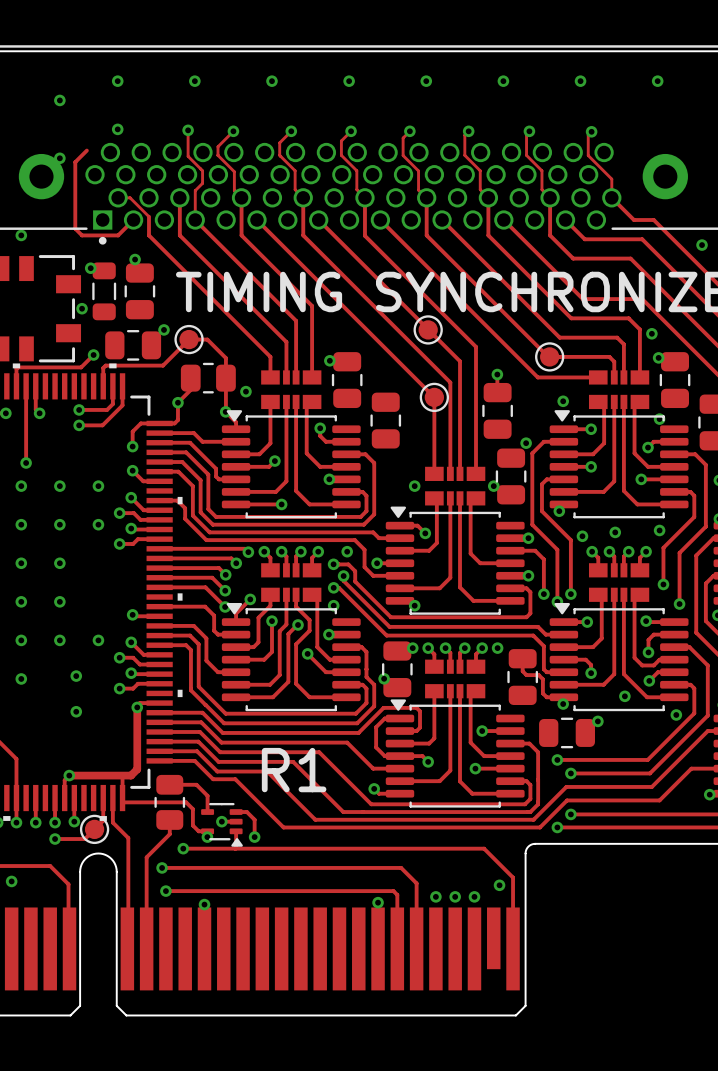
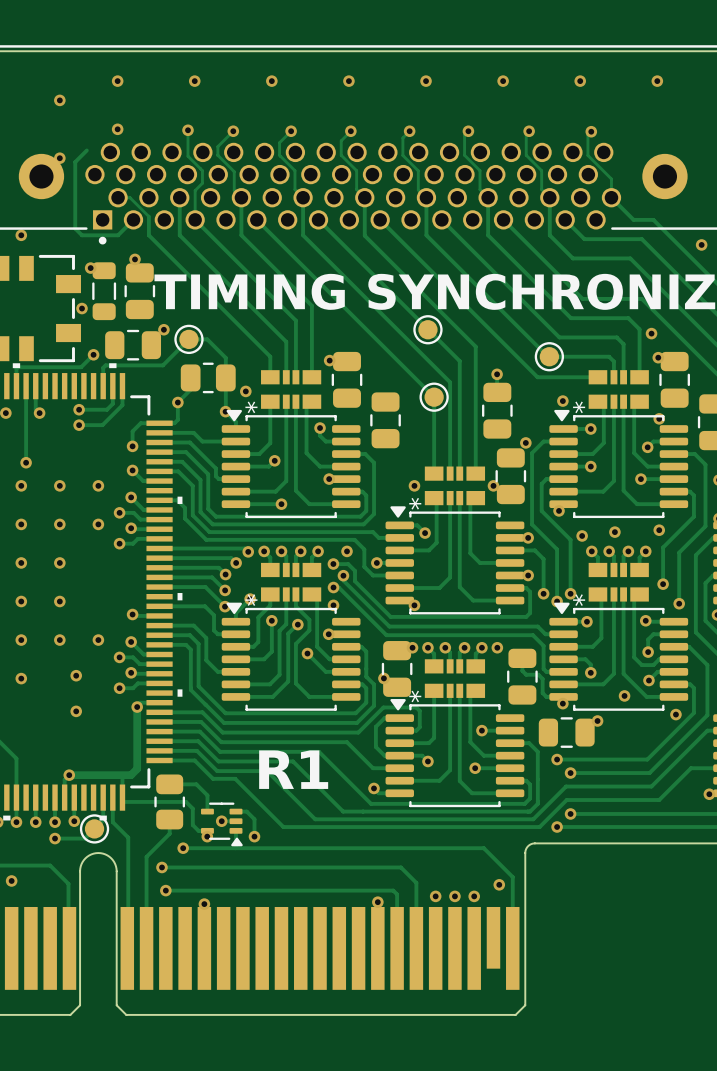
part text: none -> * (251, 407)
part text: none -> * (579, 407)
part text: none -> * (415, 503)
part text: none -> * (251, 600)
part text: none -> * (579, 600)
part text: none -> * (415, 696)

